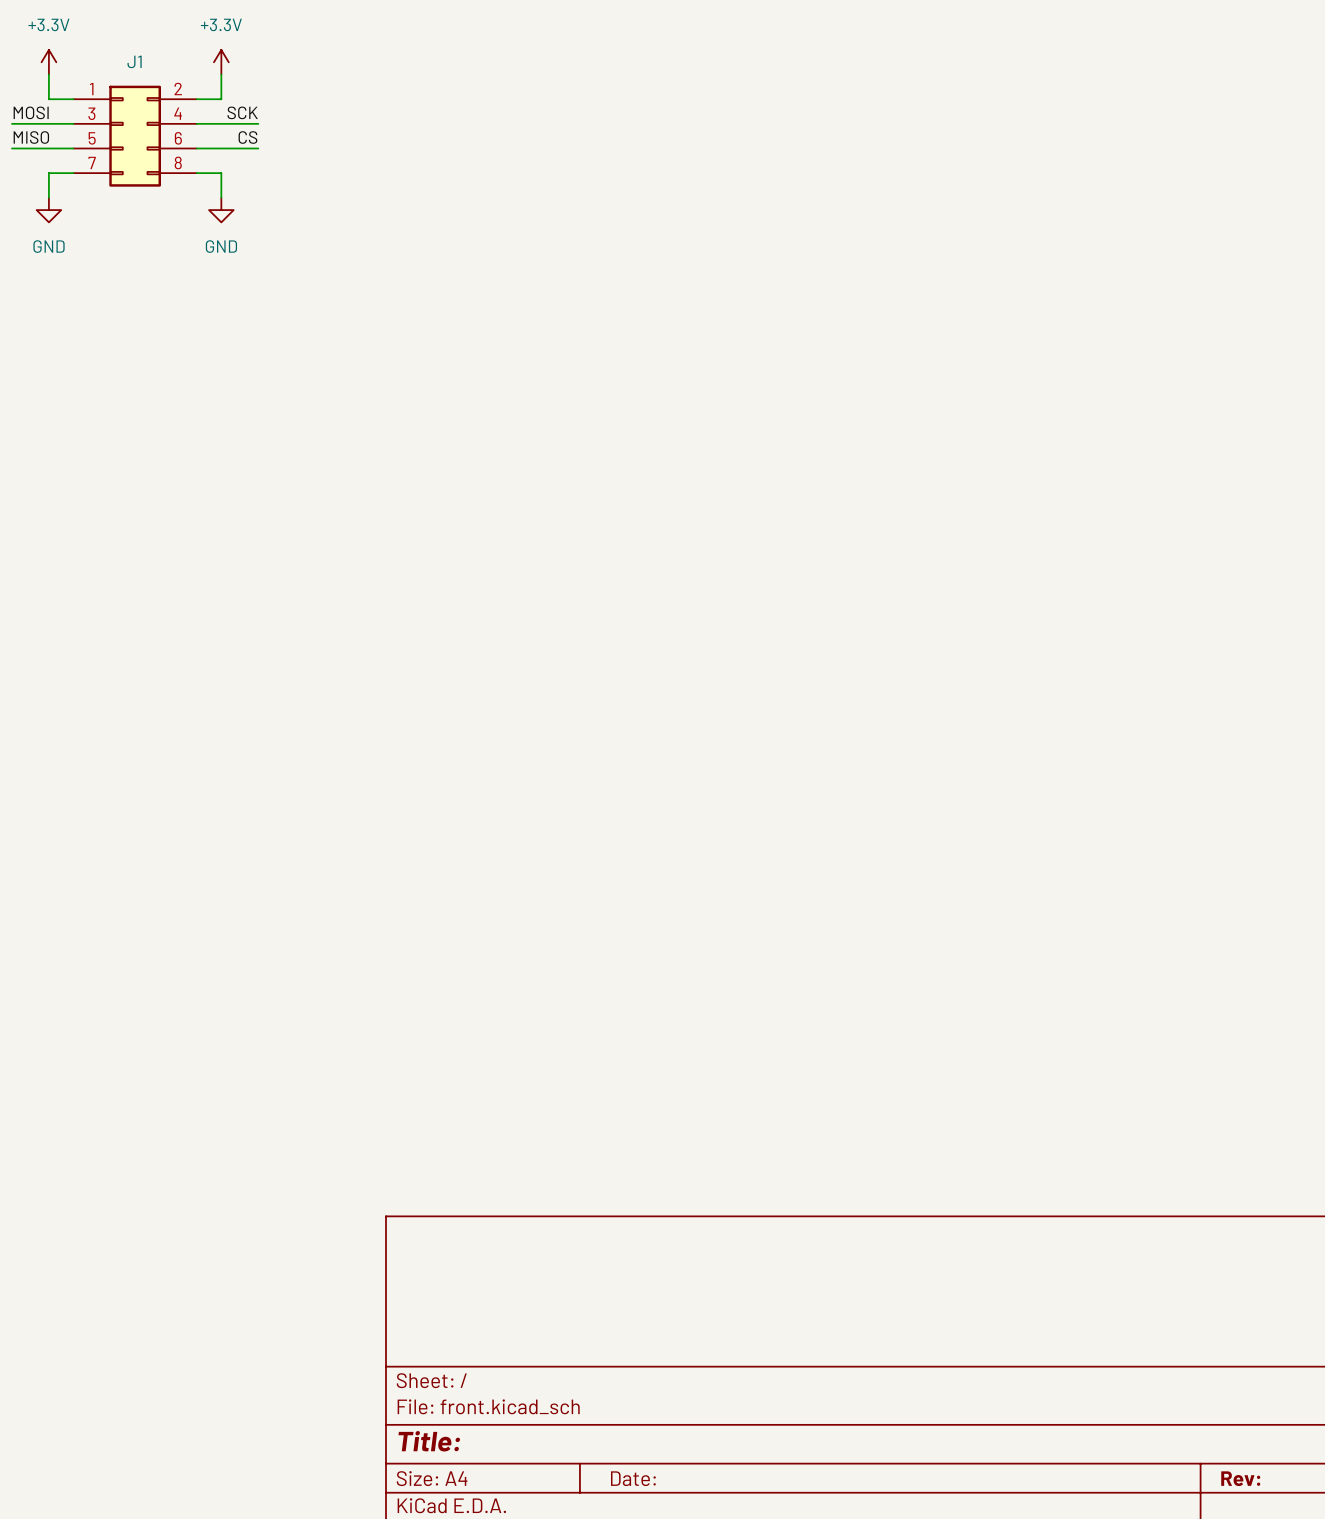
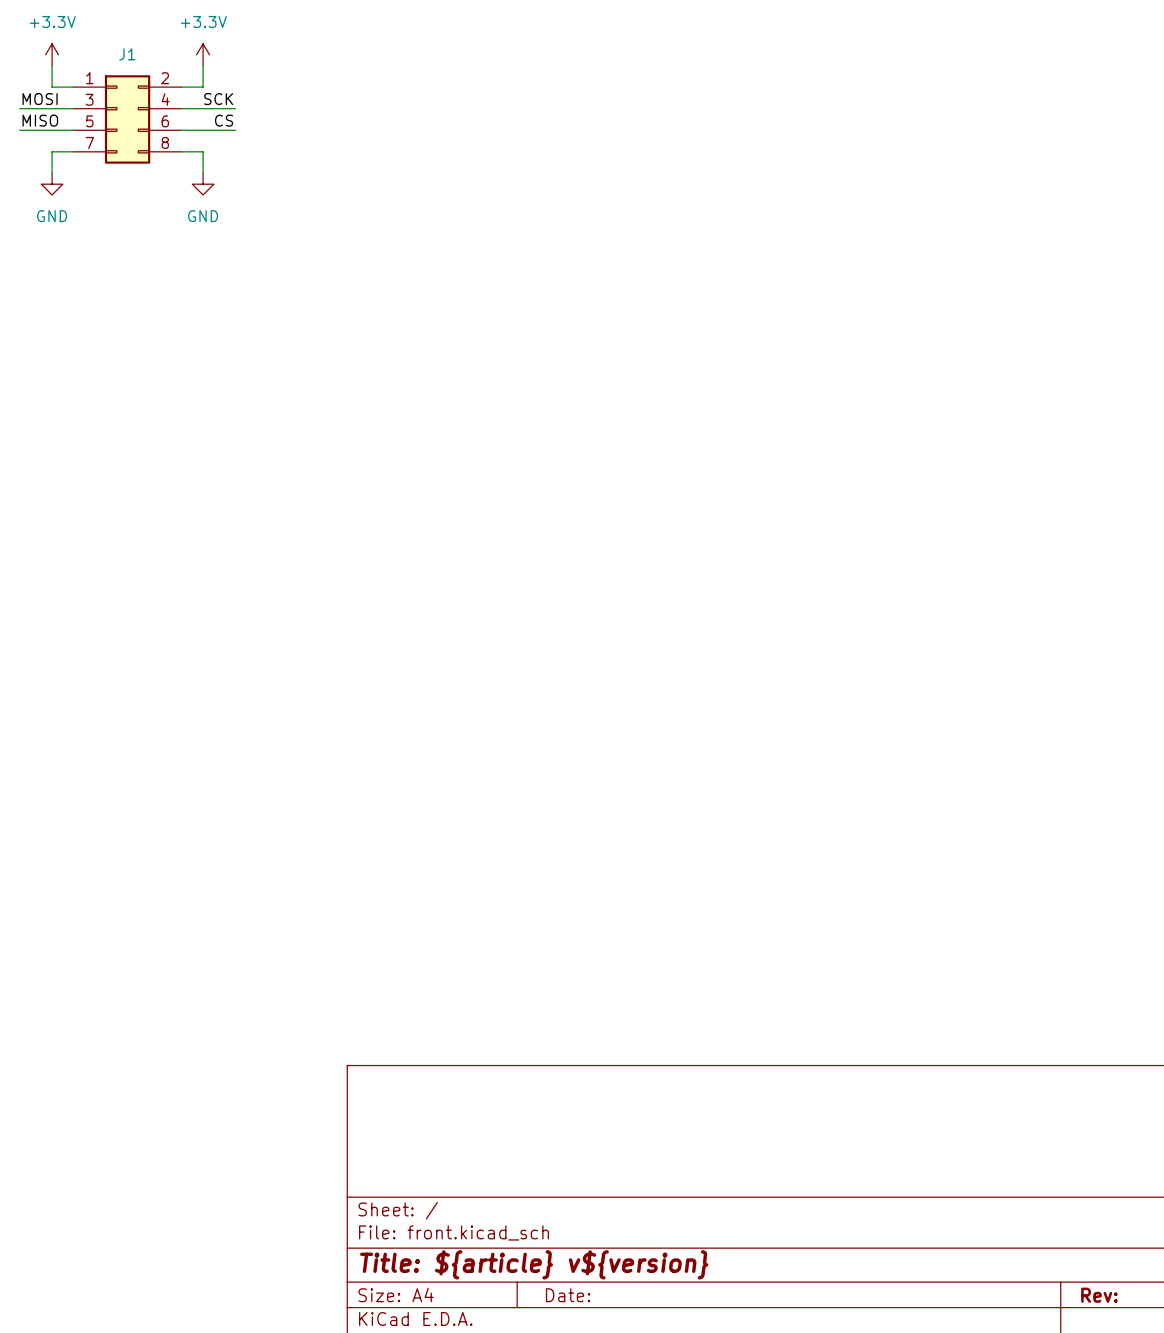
title block: Title: (429, 1441) -> Title: ${article} v${version} (534, 1264)

